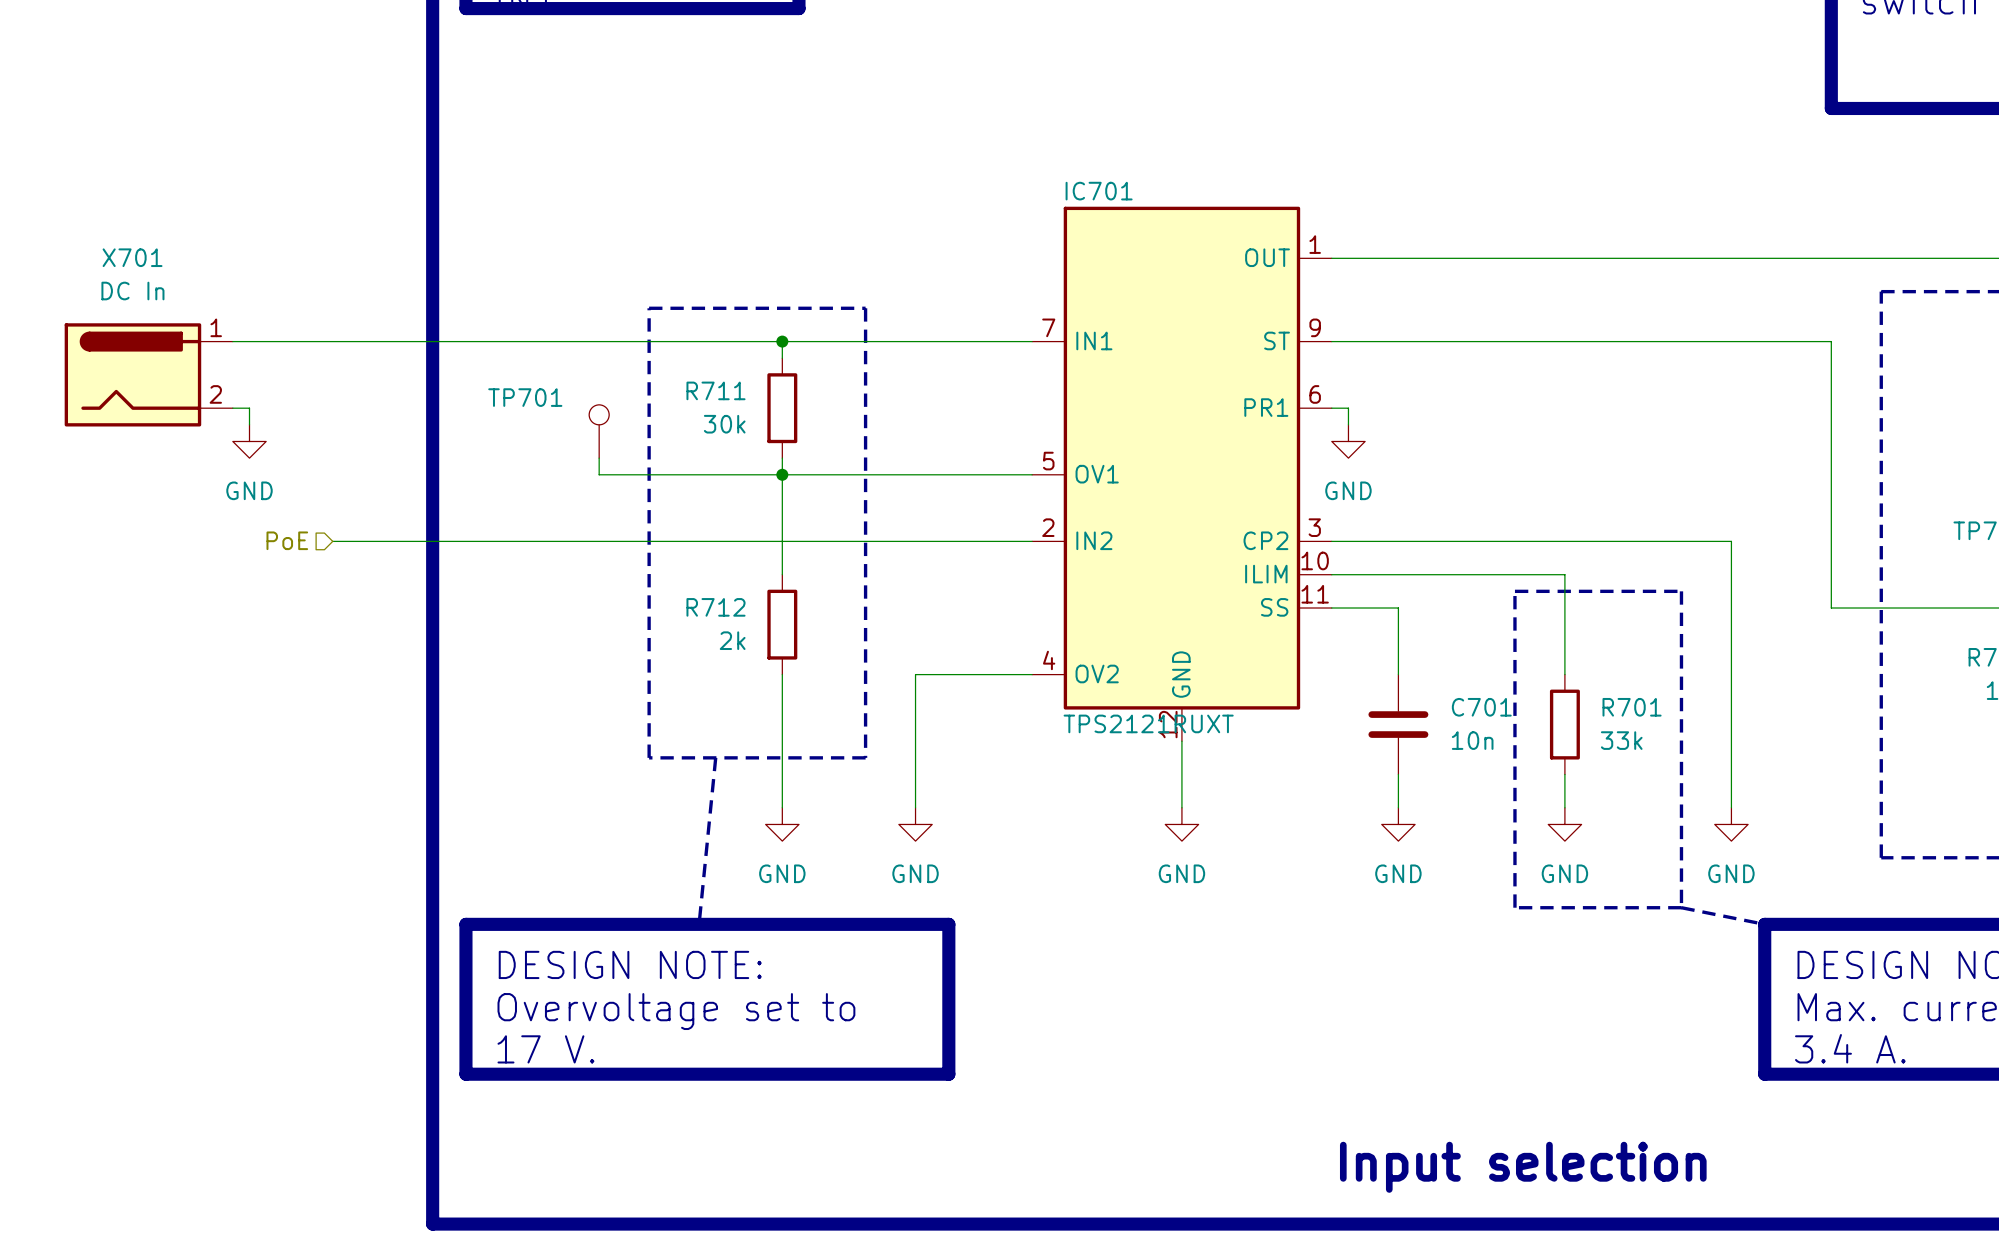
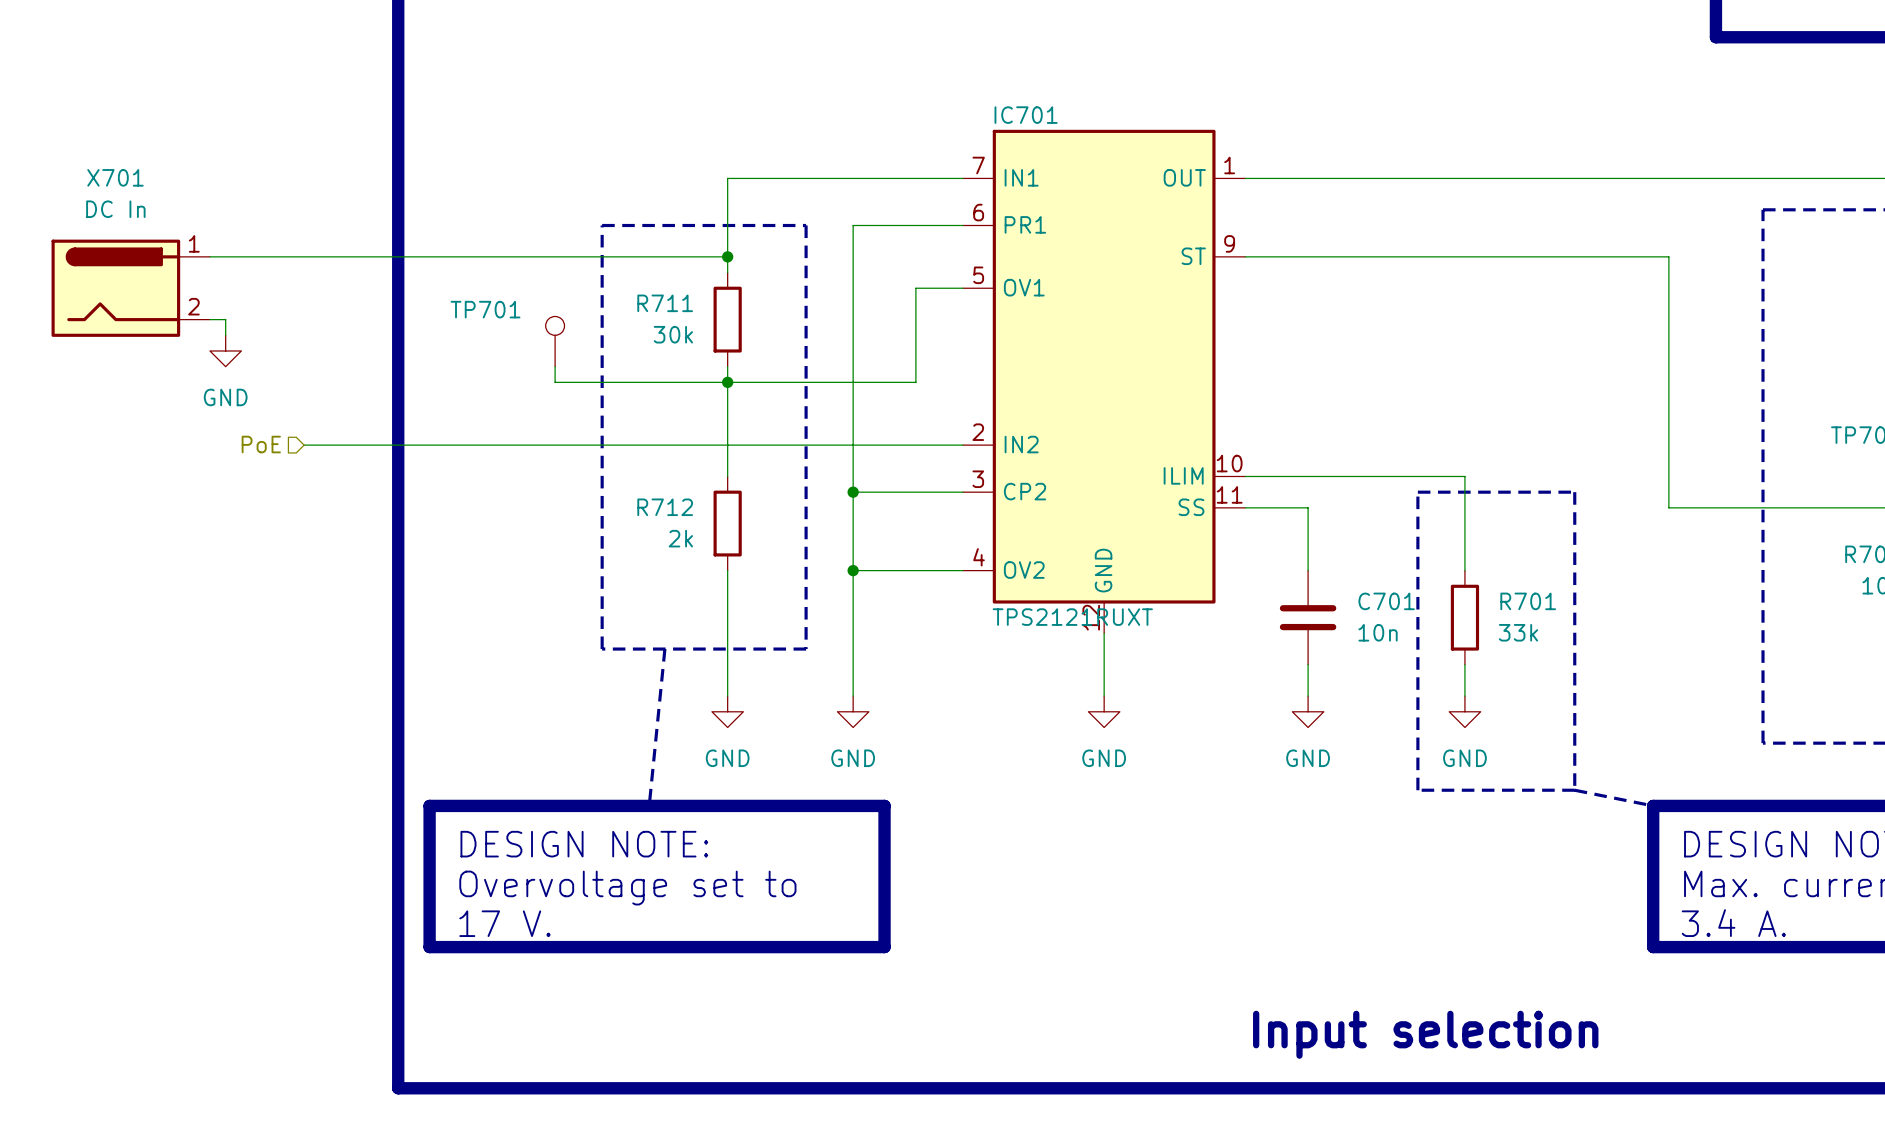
IC701 symbol: [1032, 206, 1332, 742] -> [962, 129, 1246, 634]
wire: none -> (962, 225) (853, 225) (853, 570)
wire: (782, 341) (1032, 341) -> (727, 256) (727, 178) (962, 178)
wire: (1781, 341) (1831, 341) (1831, 608) -> (1668, 256) (1668, 507) (1715, 507)
wire: (1331, 408) (1348, 408) (1348, 424) -> none
power symbol: GND (1348, 441) -> none
wire: (982, 474) (1032, 474) -> (915, 382) (915, 288) (962, 288)
wire: (1331, 541) (1731, 541) (1731, 807) -> none
wire: none -> (853, 492) (962, 492)
junction: none -> (853, 492)
junction: none -> (853, 570)
power symbol: GND (1731, 824) -> none

